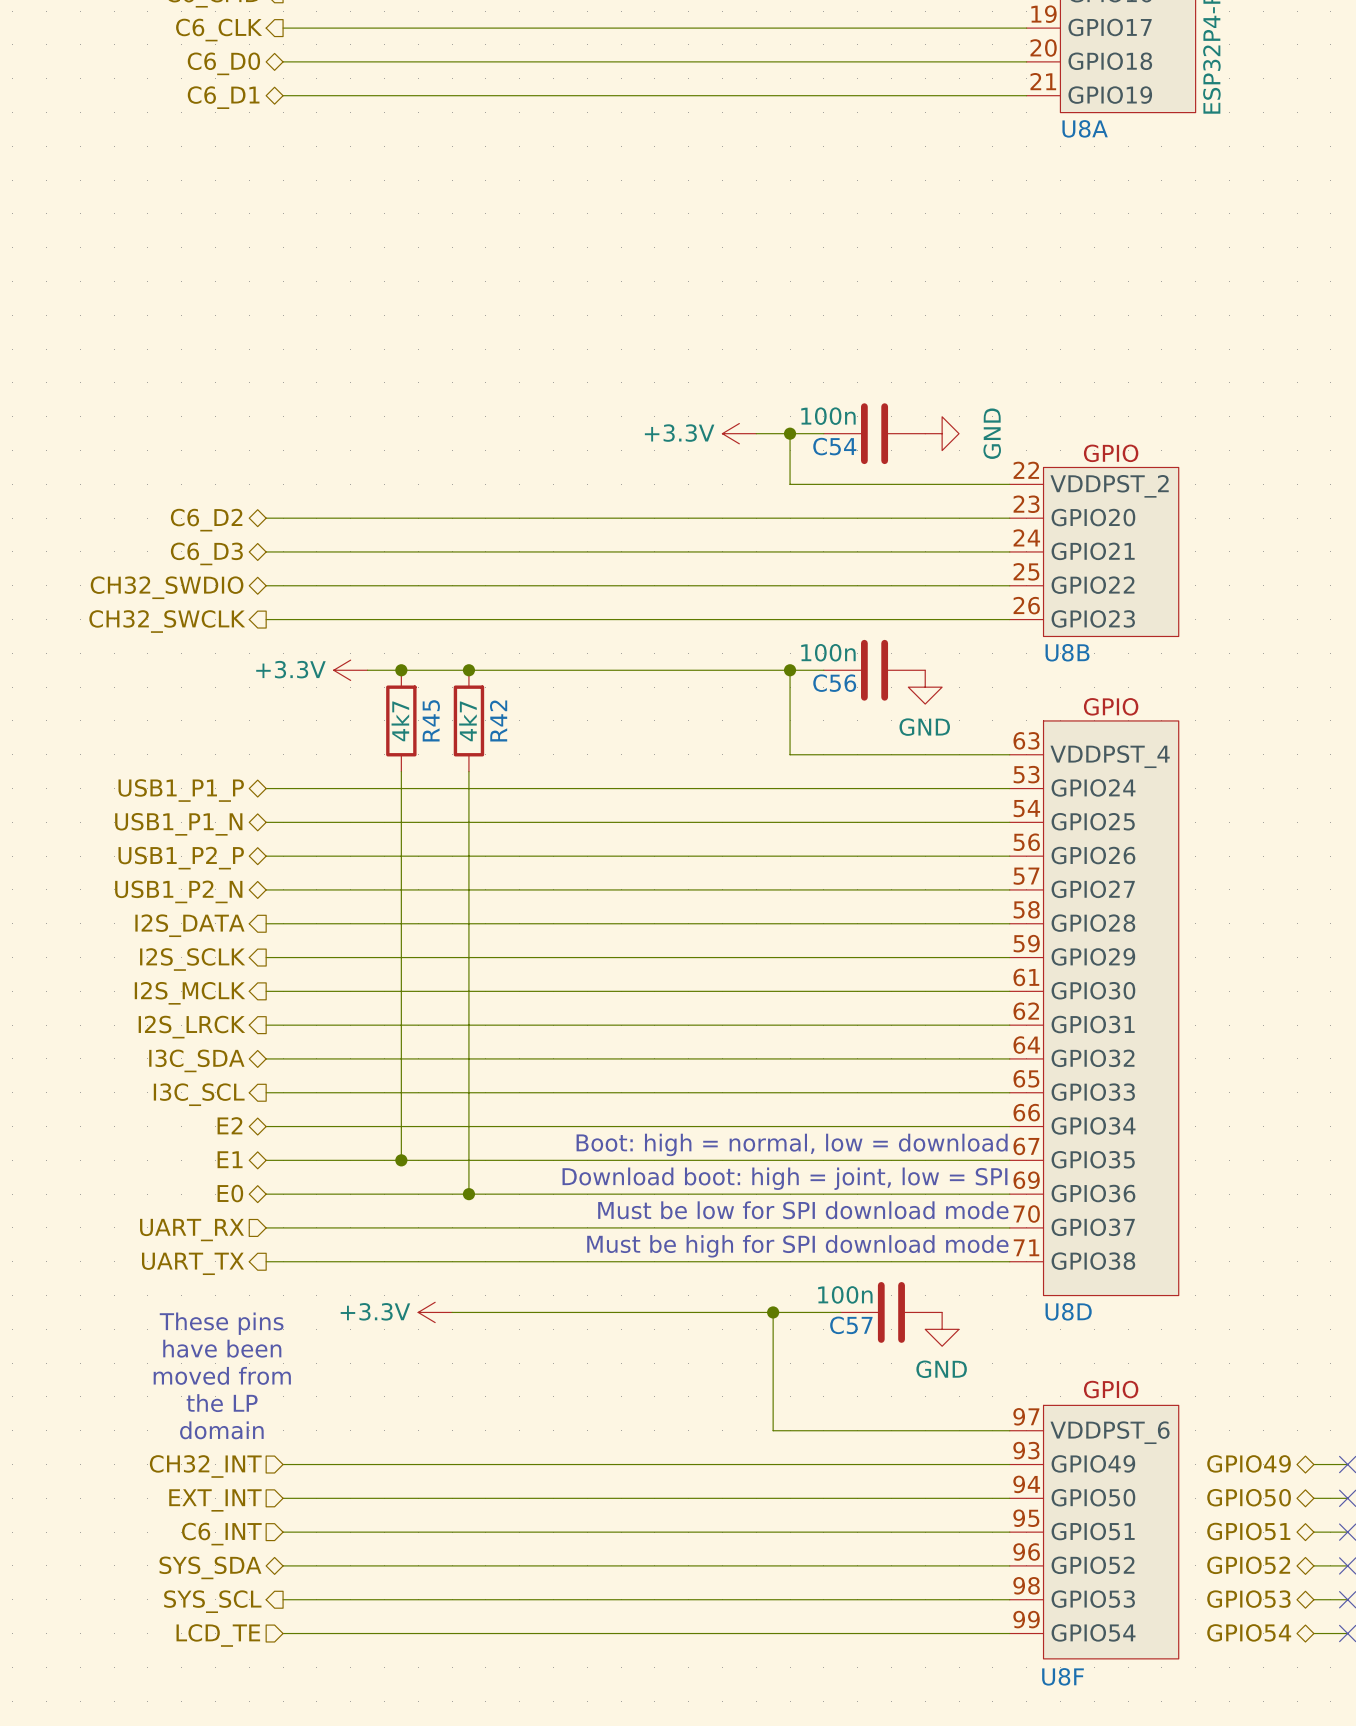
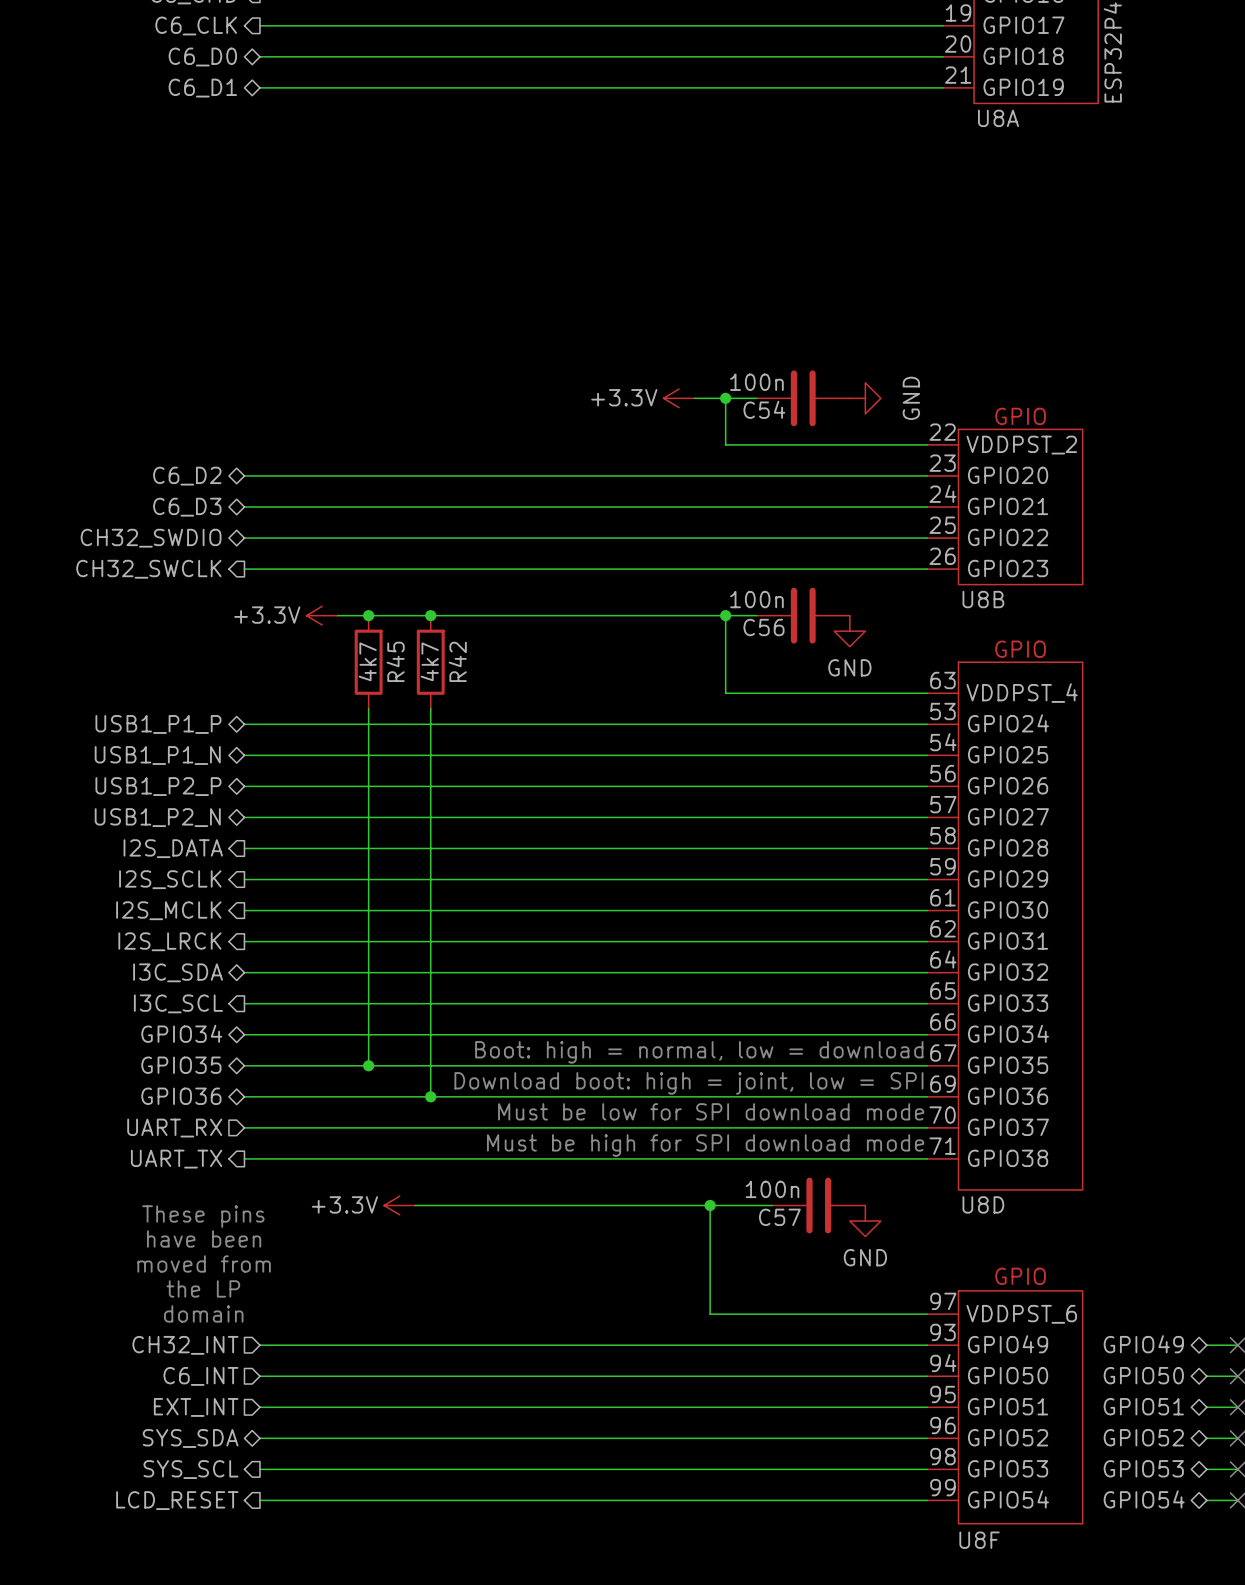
hierarchical label: E2 (229, 1125) -> GPIO34 (181, 1033)
hierarchical label: E1 (230, 1159) -> GPIO35 (181, 1065)
hierarchical label: E0 (230, 1193) -> GPIO36 (181, 1096)
hierarchical label: EXT_INT (215, 1500) -> C6_INT (200, 1376)
hierarchical label: C6_INT (221, 1534) -> EXT_INT (196, 1407)
hierarchical label shape: input (218, 1635) -> output (177, 1500)
hierarchical label: LCD_TE (218, 1635) -> LCD_RESET (177, 1500)

